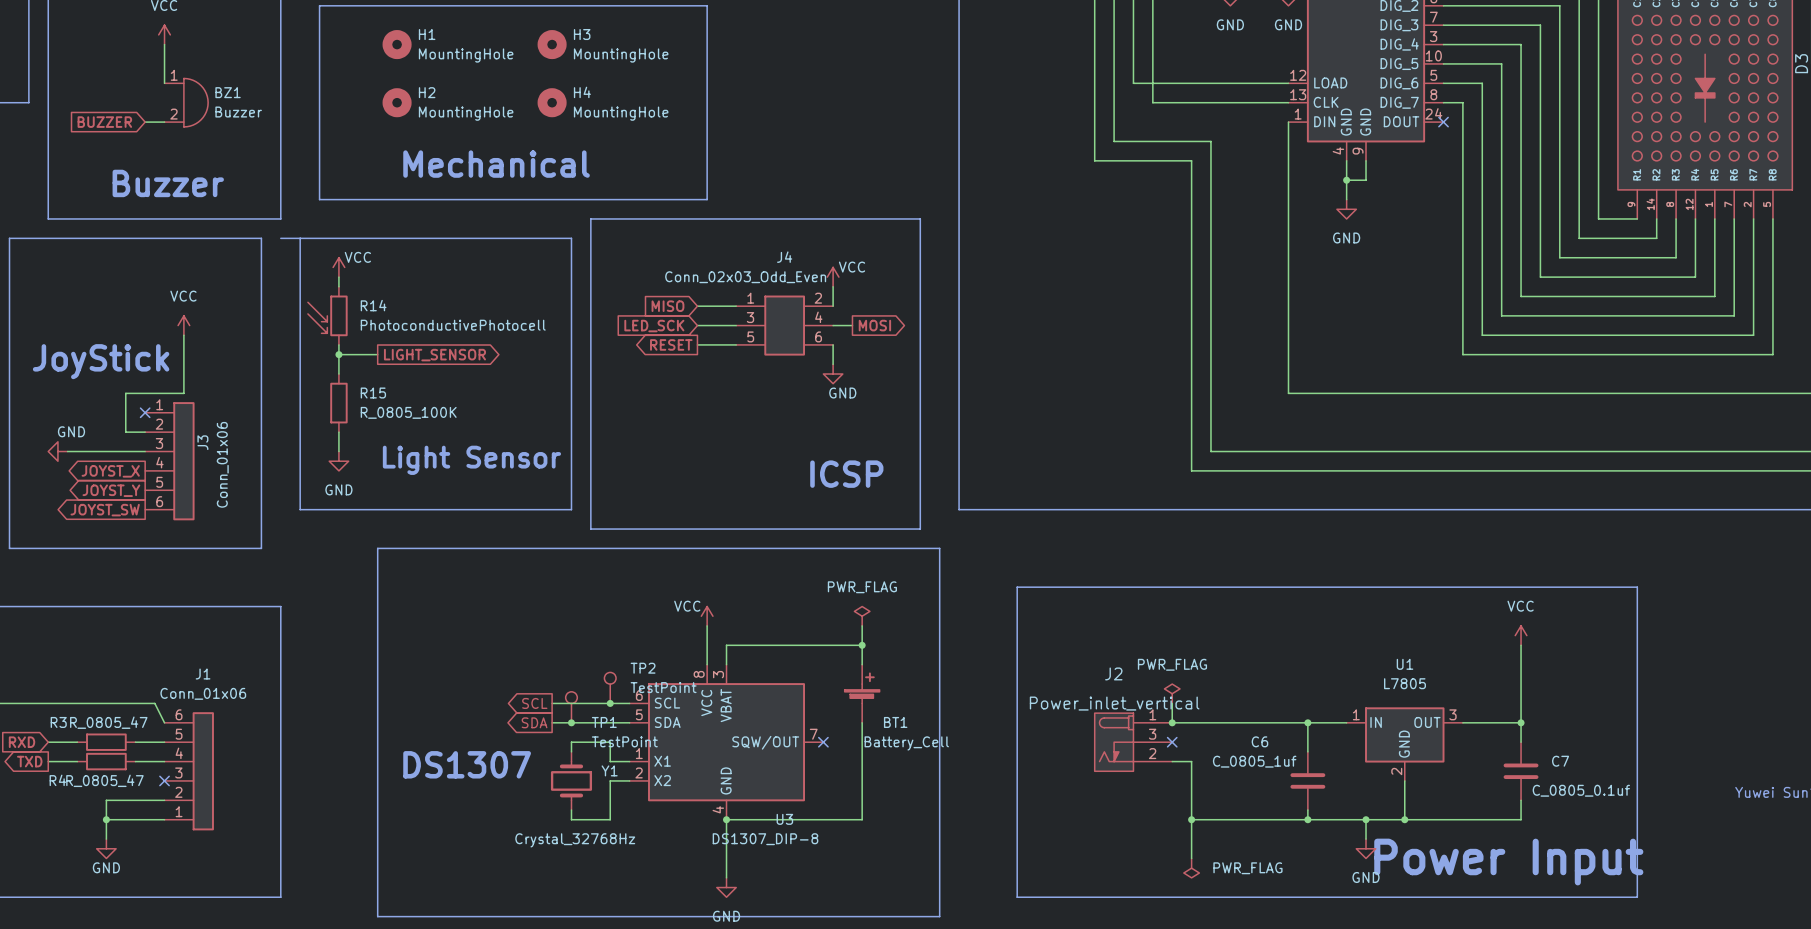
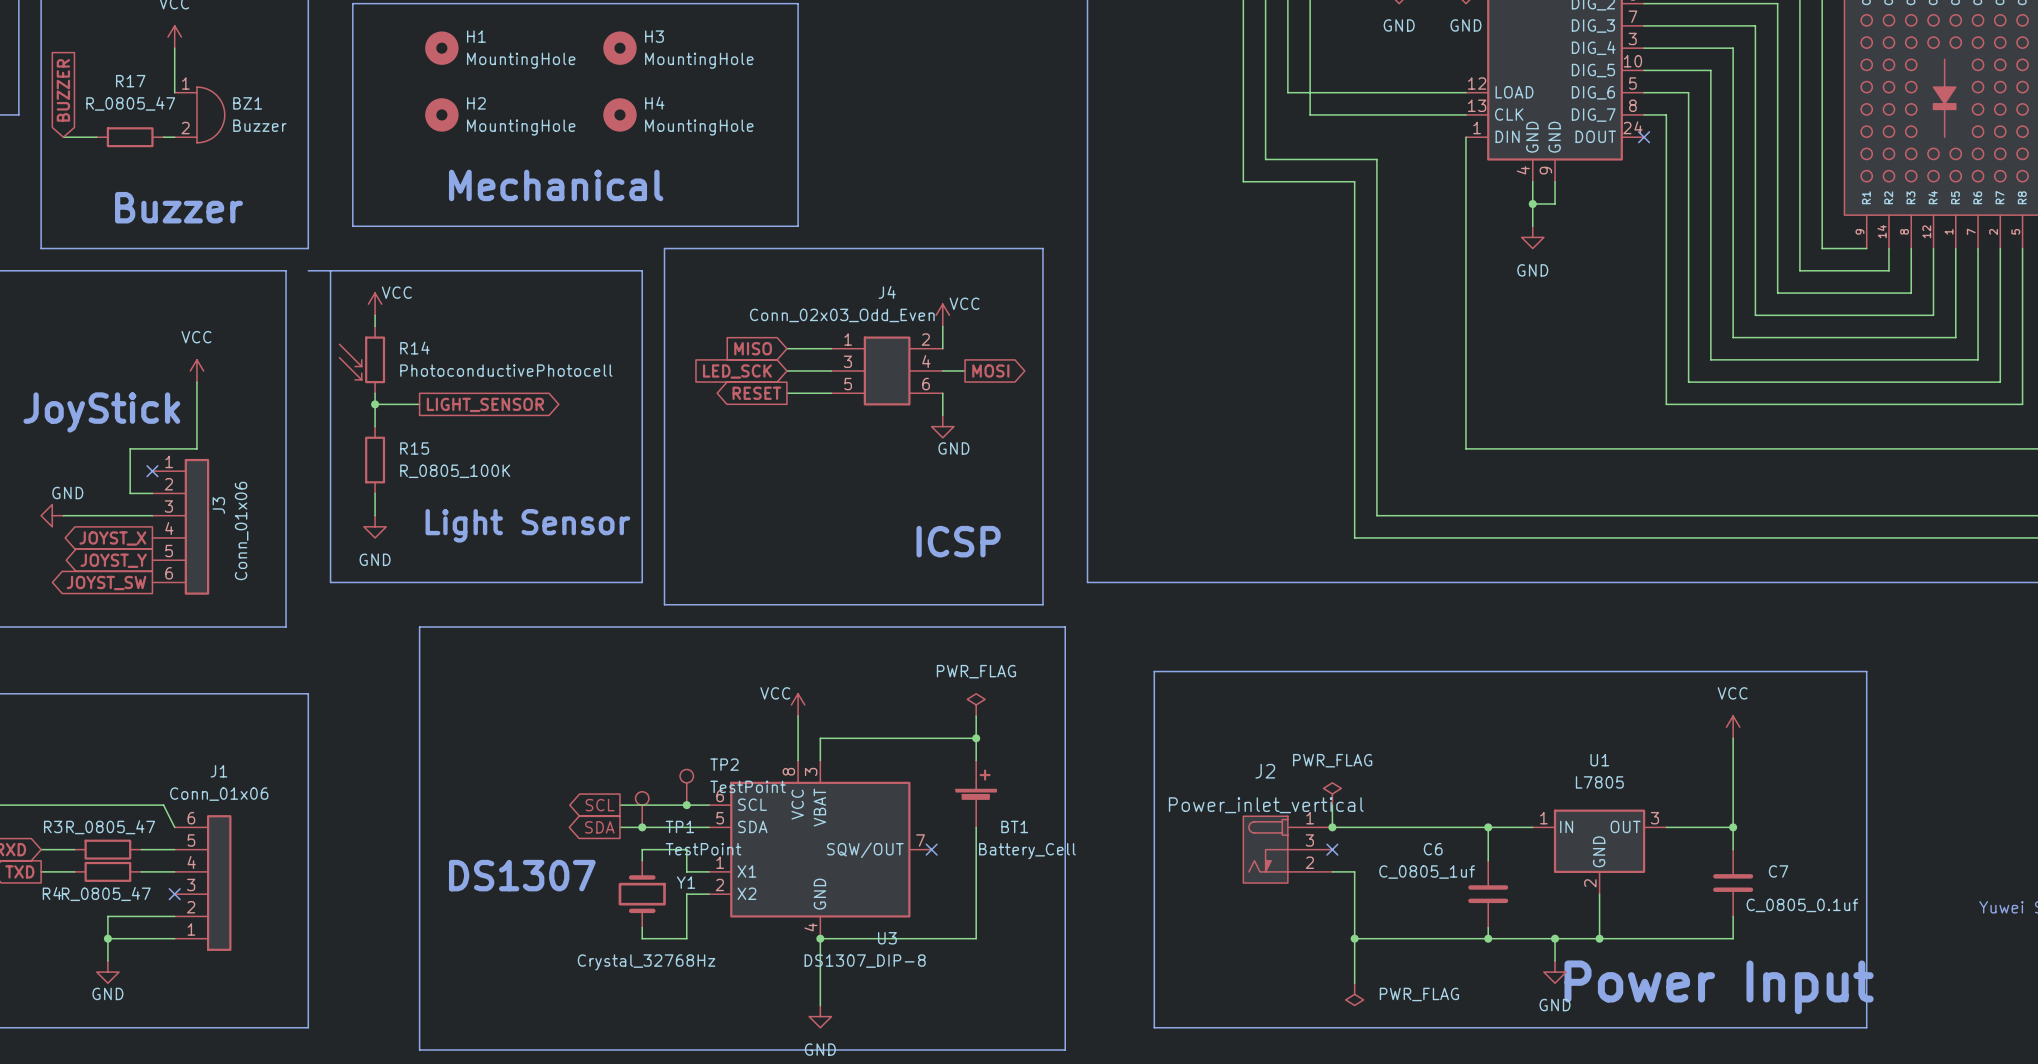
wire: none -> (63, 137) (96, 137)
global label rotation: 0° (104, 122) -> 90° clockwise (63, 90)
R17: none -> R_0805_47 (130, 137)

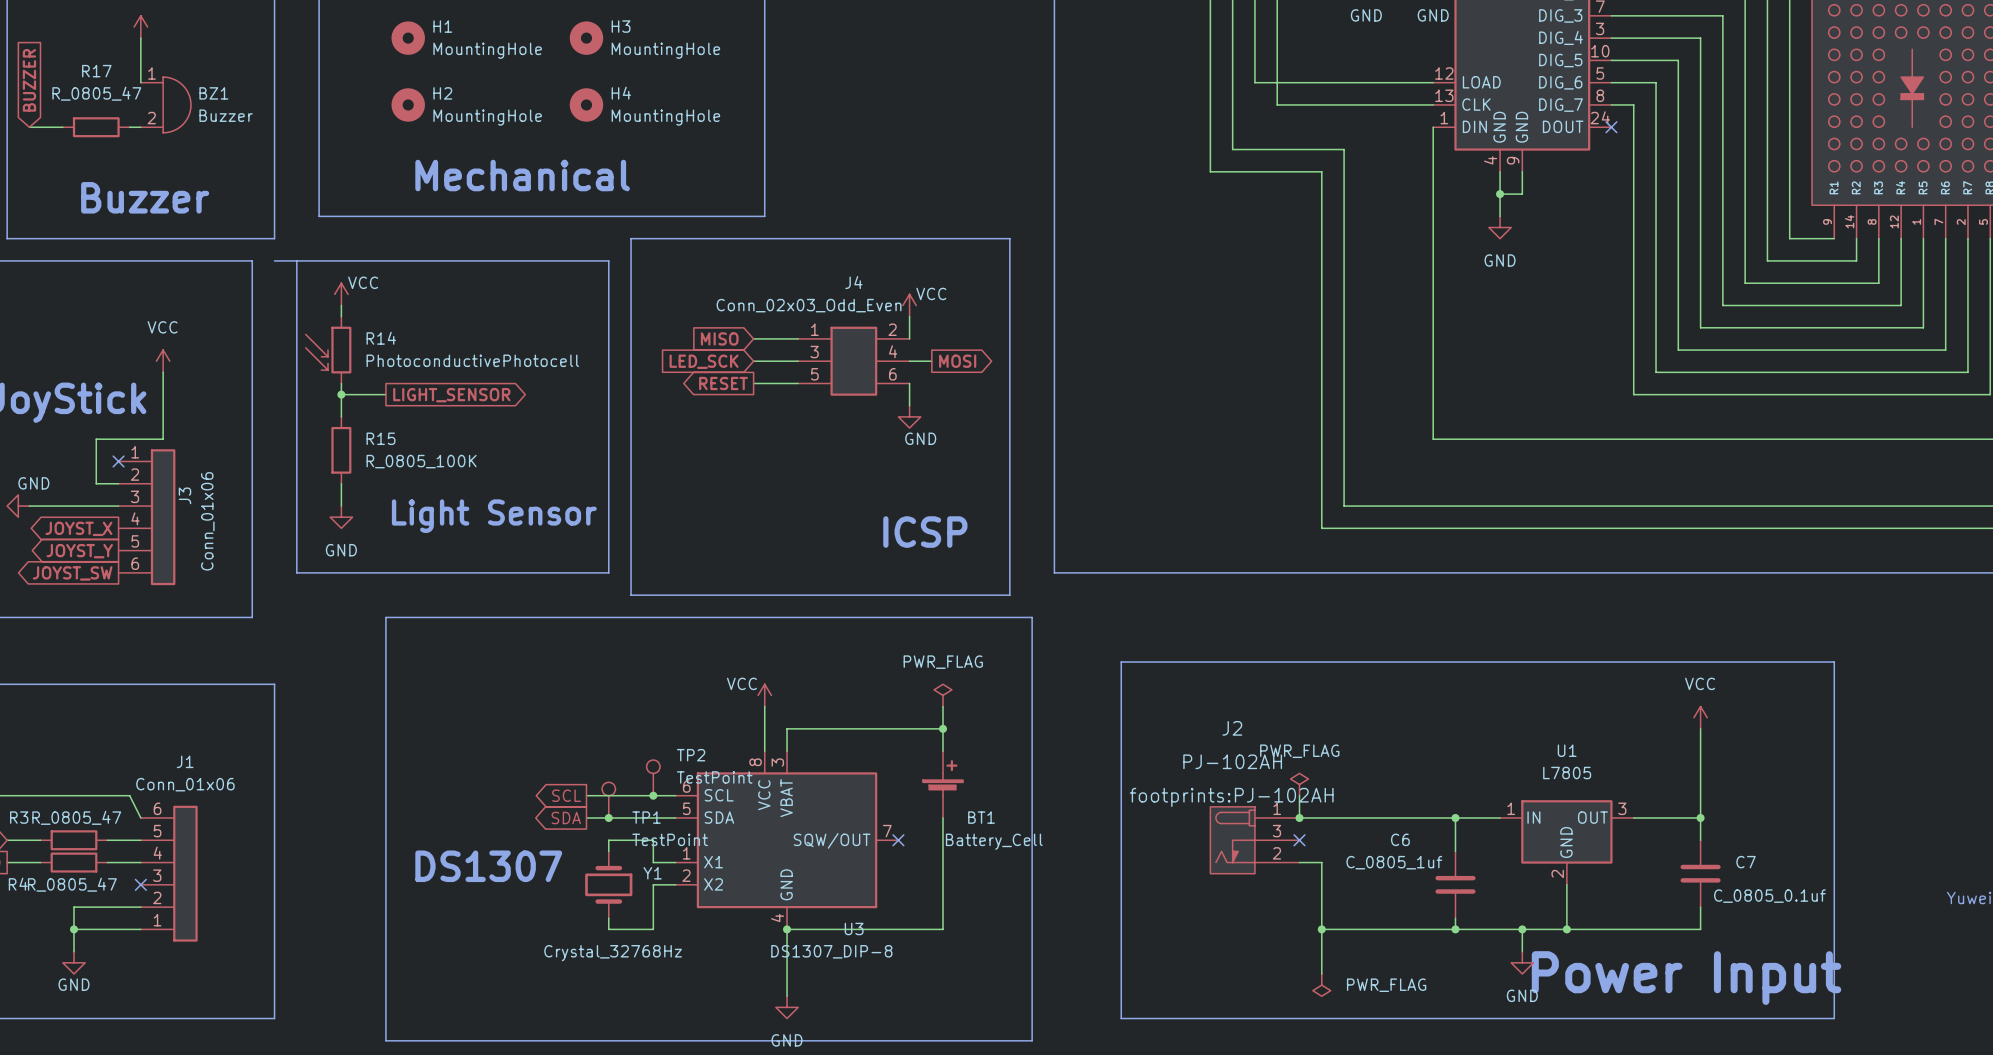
J2 name position: J2 (1265, 771) -> J2 (1232, 728)
J2 value: Power_inlet_vertical (1266, 805) -> PJ-102AH (1232, 761)
J2 text: none -> footprints:PJ-102AH (1231, 797)

